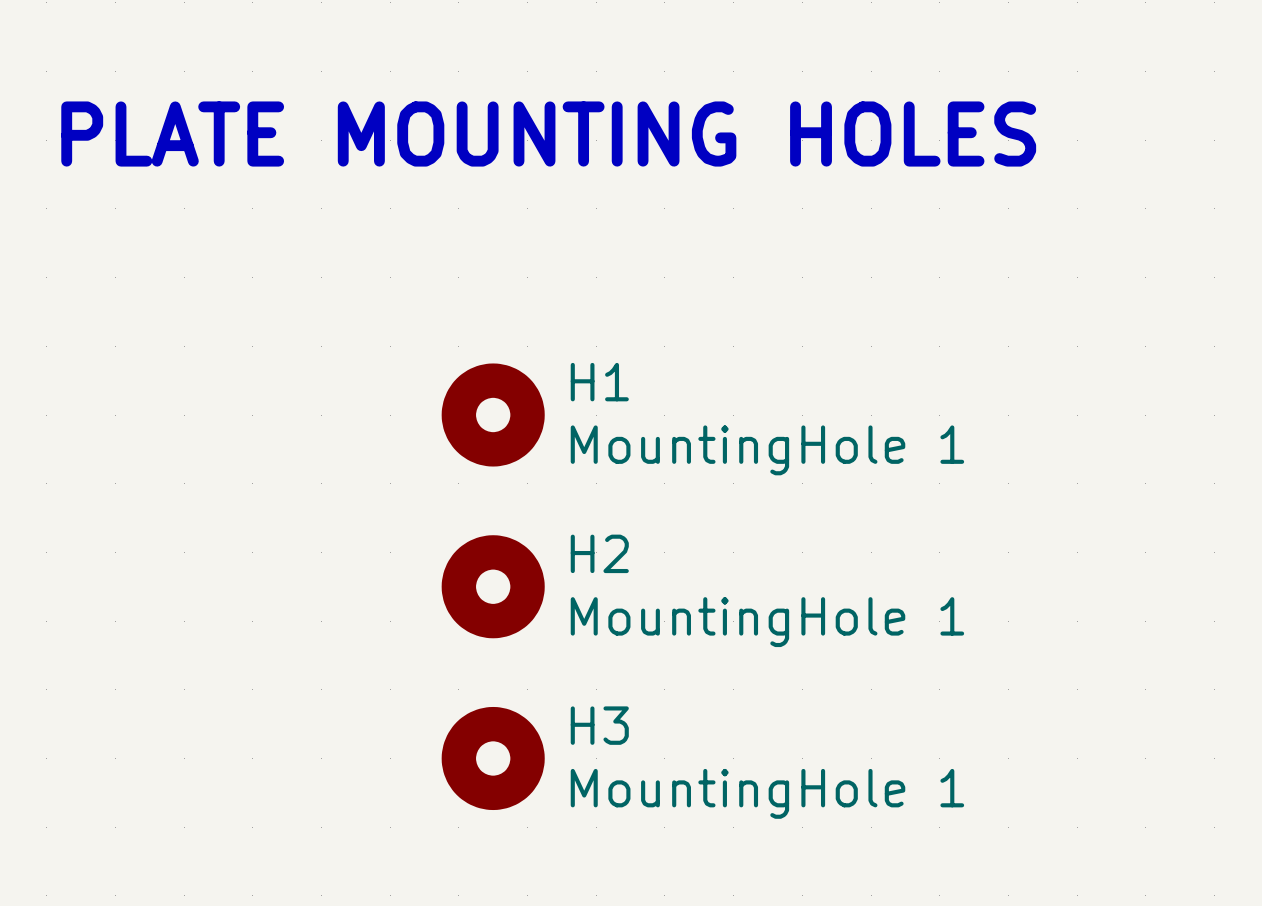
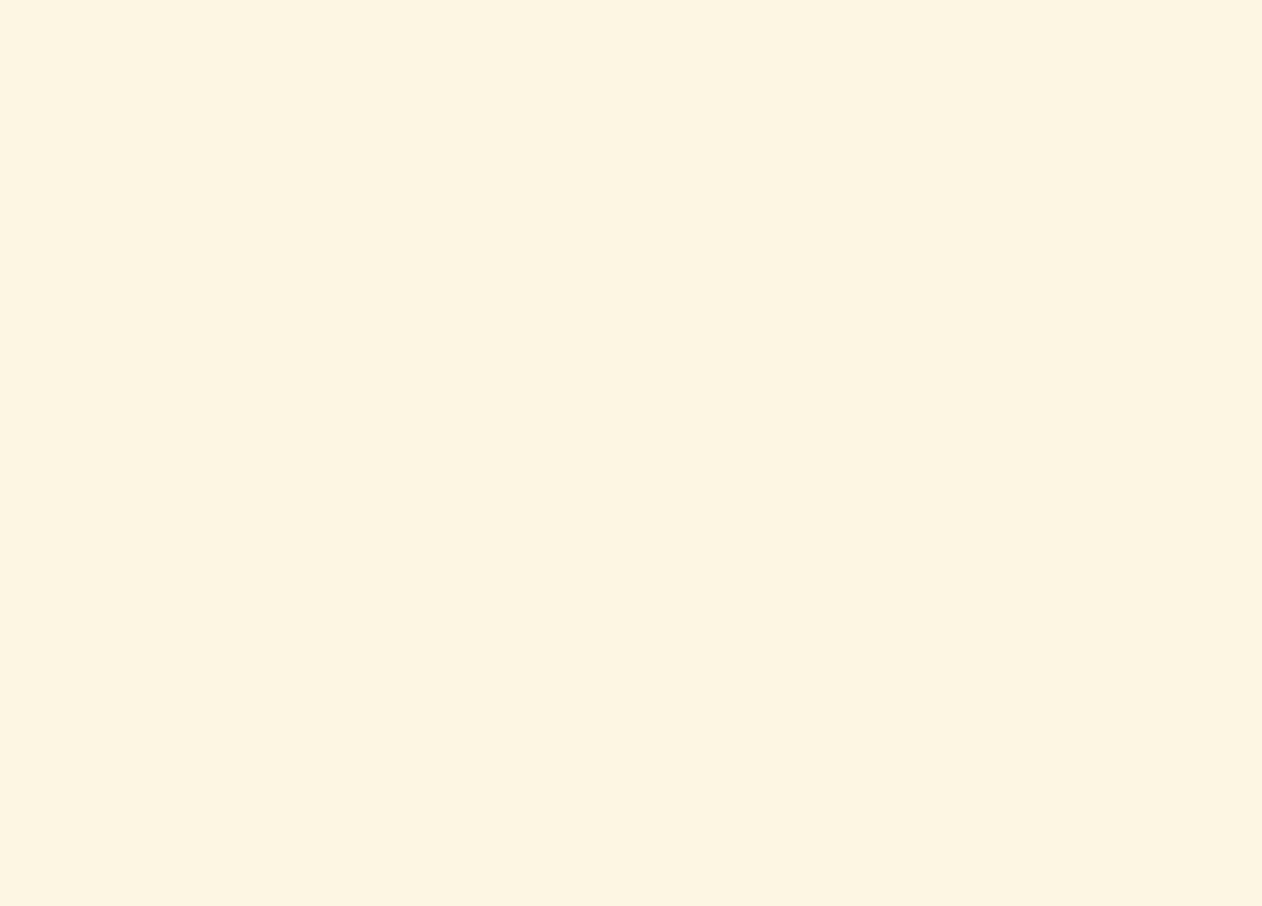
text: PLATE MOUNTING HOLES (548, 134) -> none
H1: MountingHole 1 (493, 415) -> none
H2: MountingHole 1 (493, 586) -> none
H3: MountingHole 1 (493, 758) -> none

